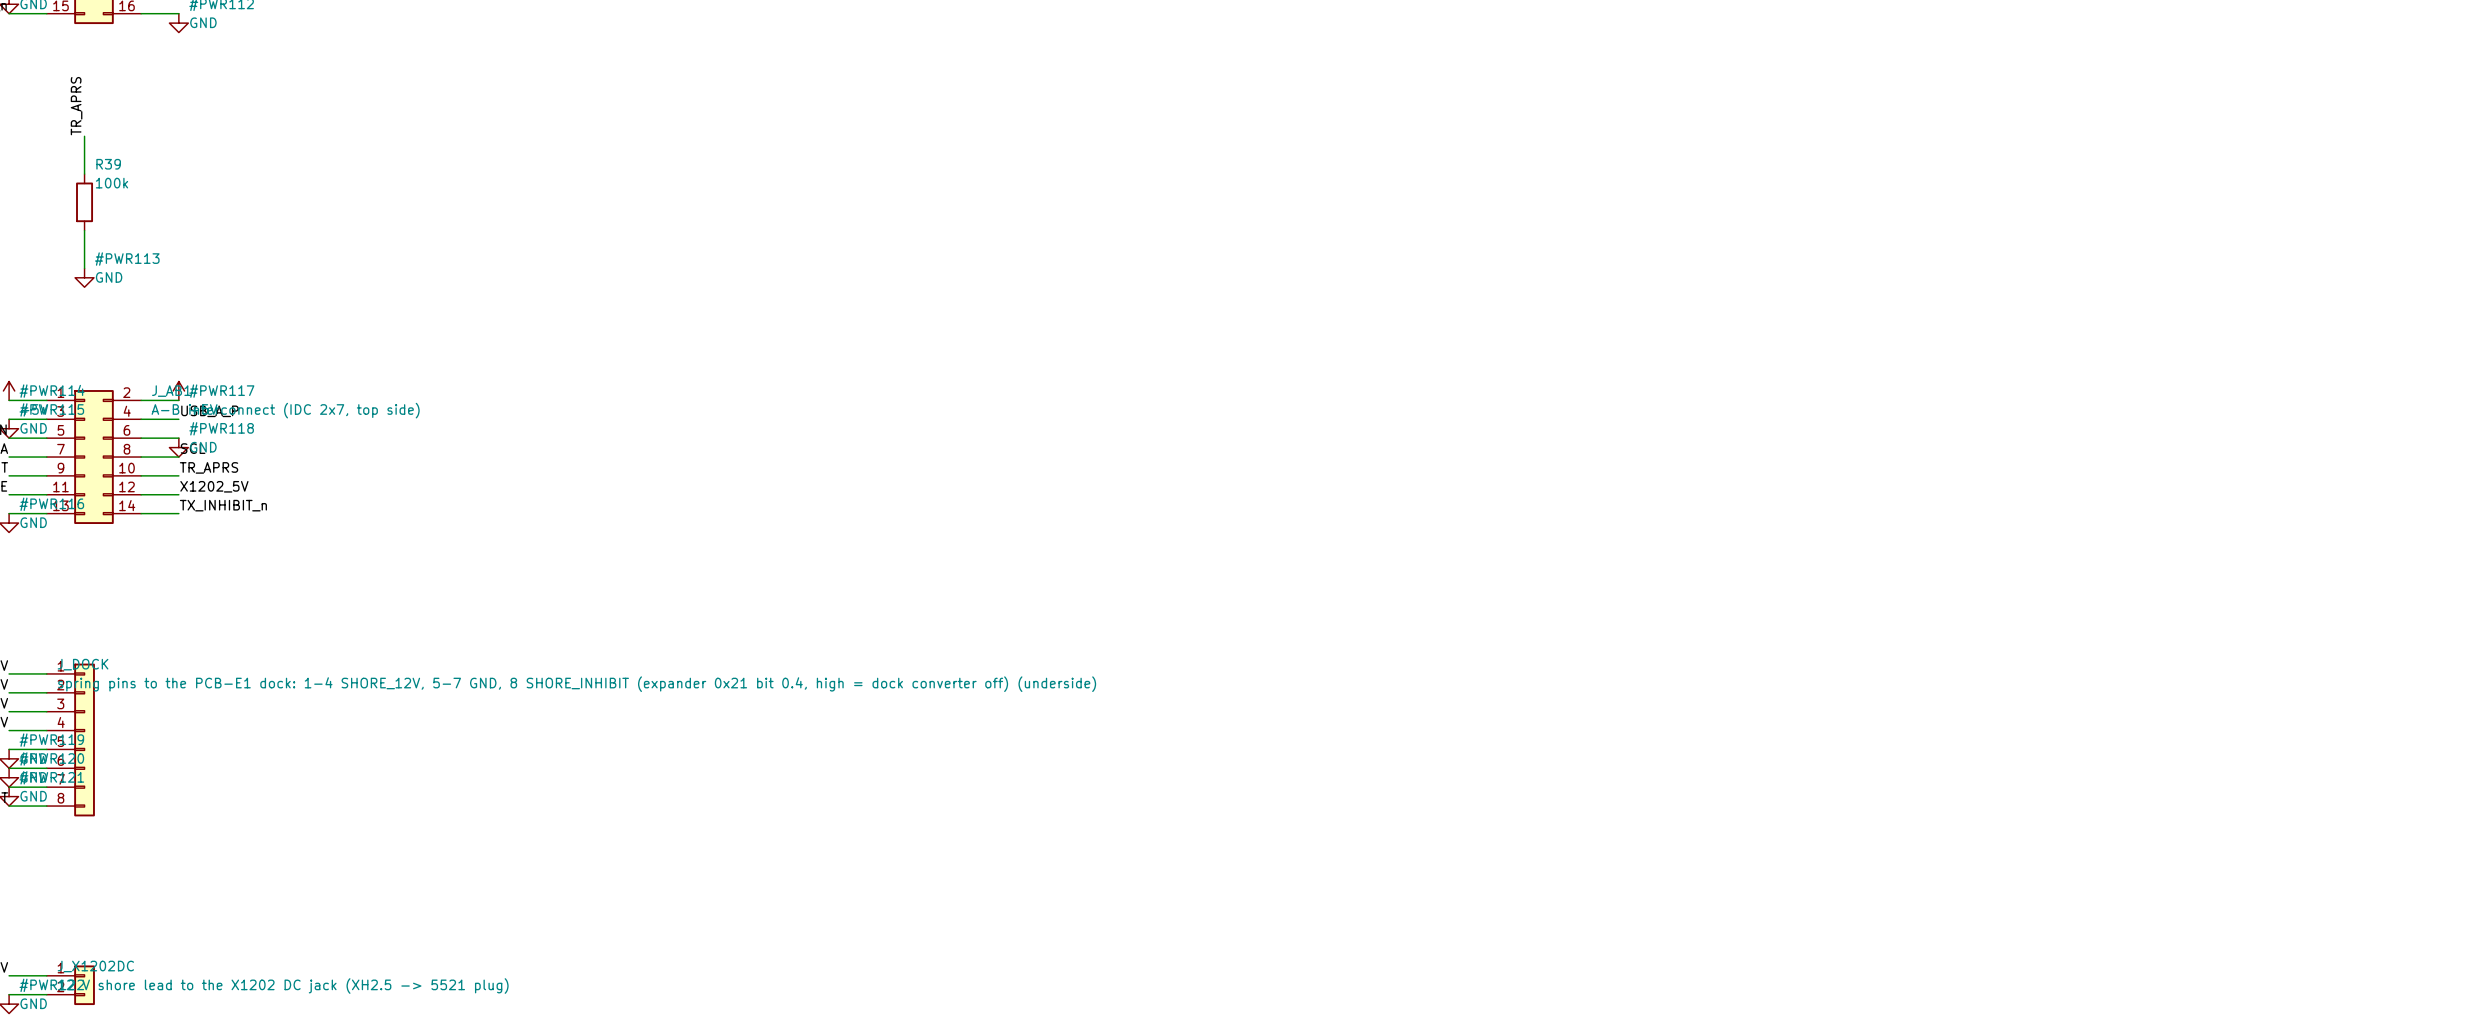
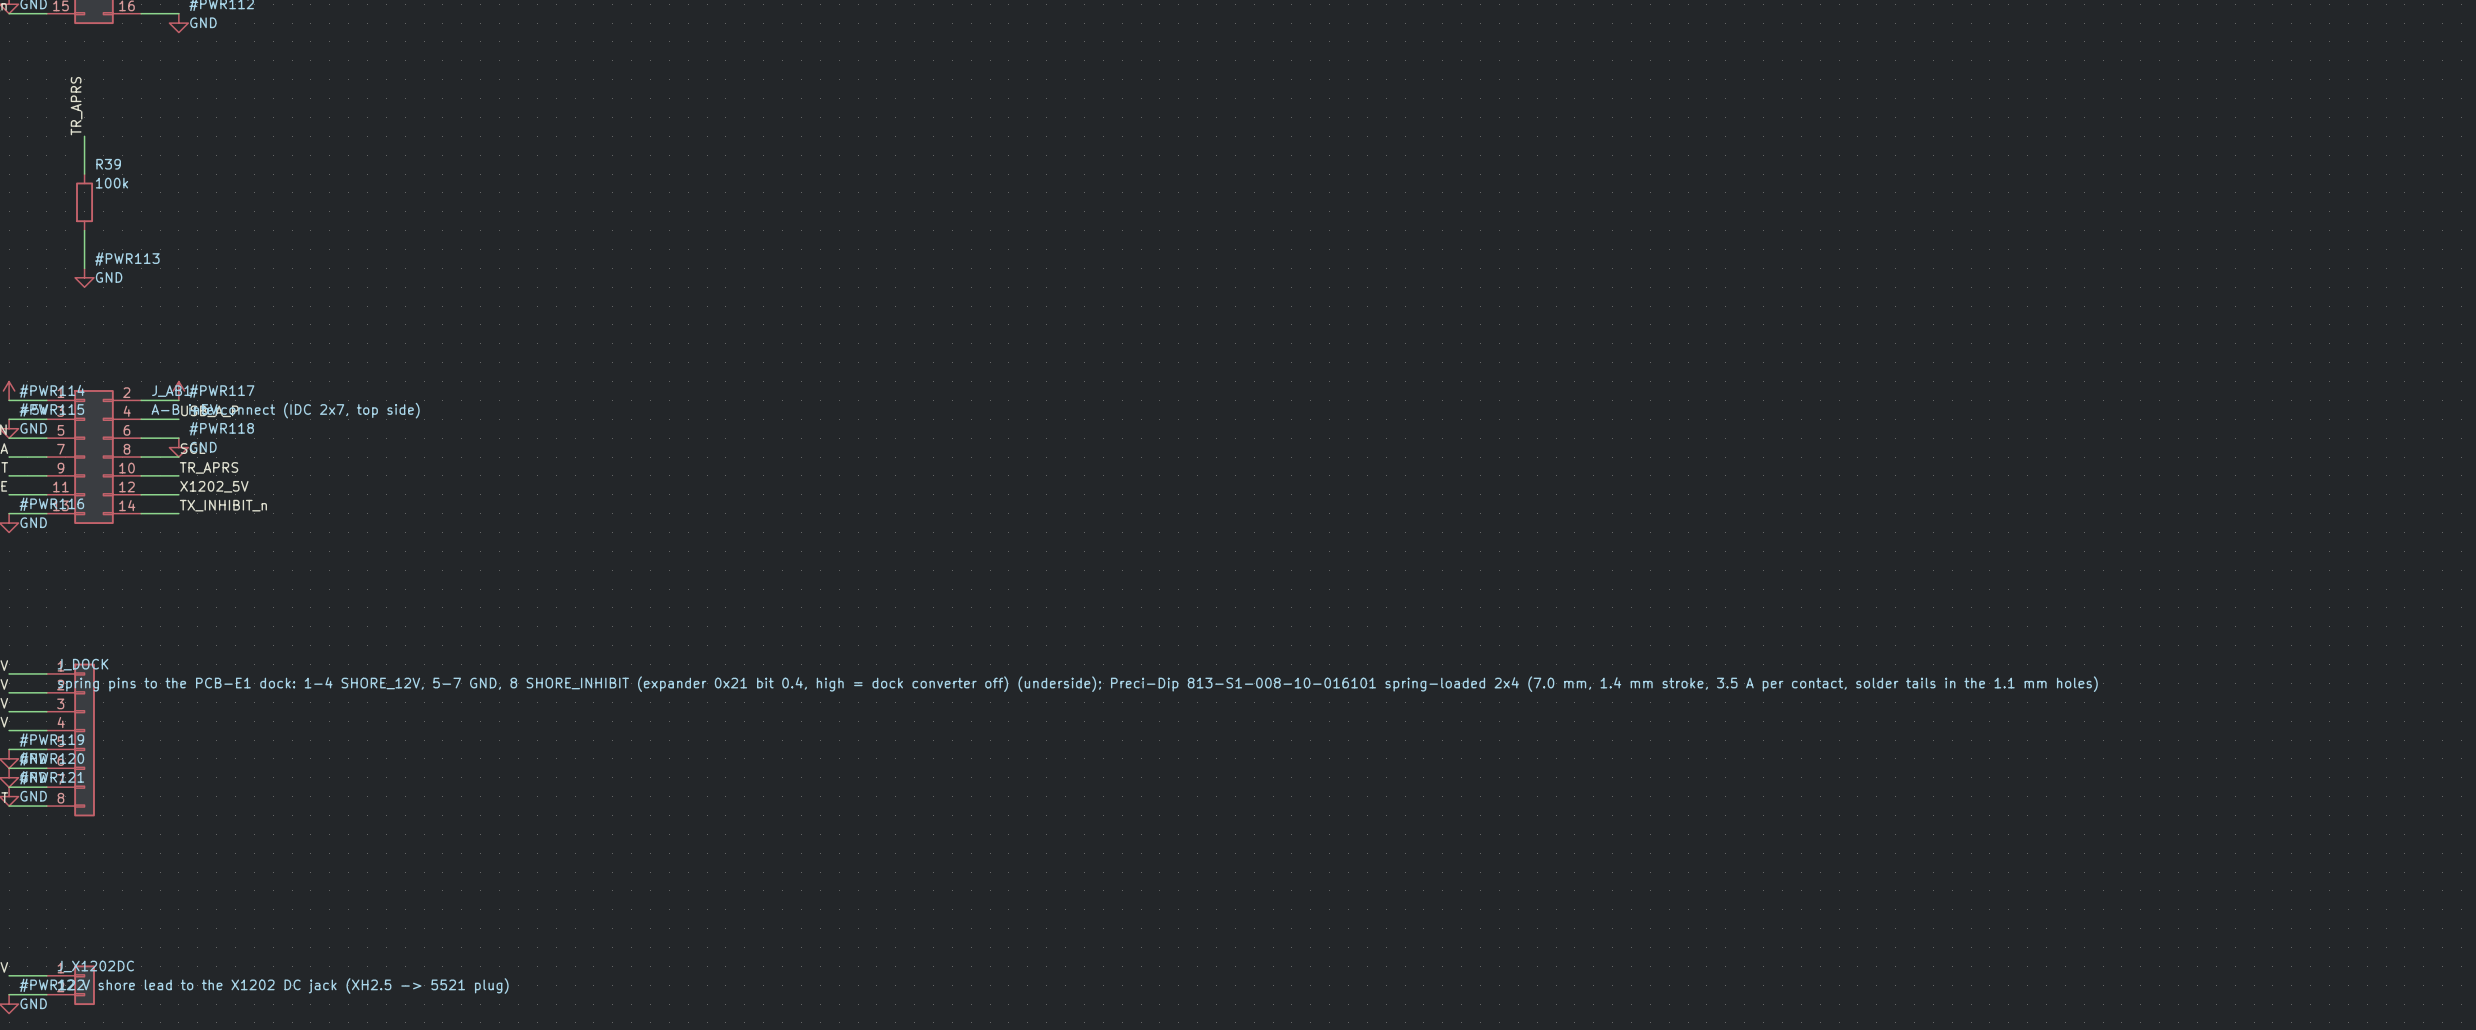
J_DOCK value: spring pins to the PCB-E1 dock: 1-4 SHORE_12V, 5-7 GND, 8 SHORE_INHIBIT (expander 0x21 bit 0.4, high = dock converter off) (underside) (577, 684) -> spring pins to the PCB-E1 dock: 1-4 SHORE_12V, 5-7 GND, 8 SHORE_INHIBIT (expander 0x21 bit 0.4, high = dock converter off) (underside); Preci-Dip 813-S1-008-10-016101 spring-loaded 2x4 (7.0 mm, 1.4 mm stroke, 3.5 A per contact, solder tails in the 1.1 mm holes) (1077, 684)

